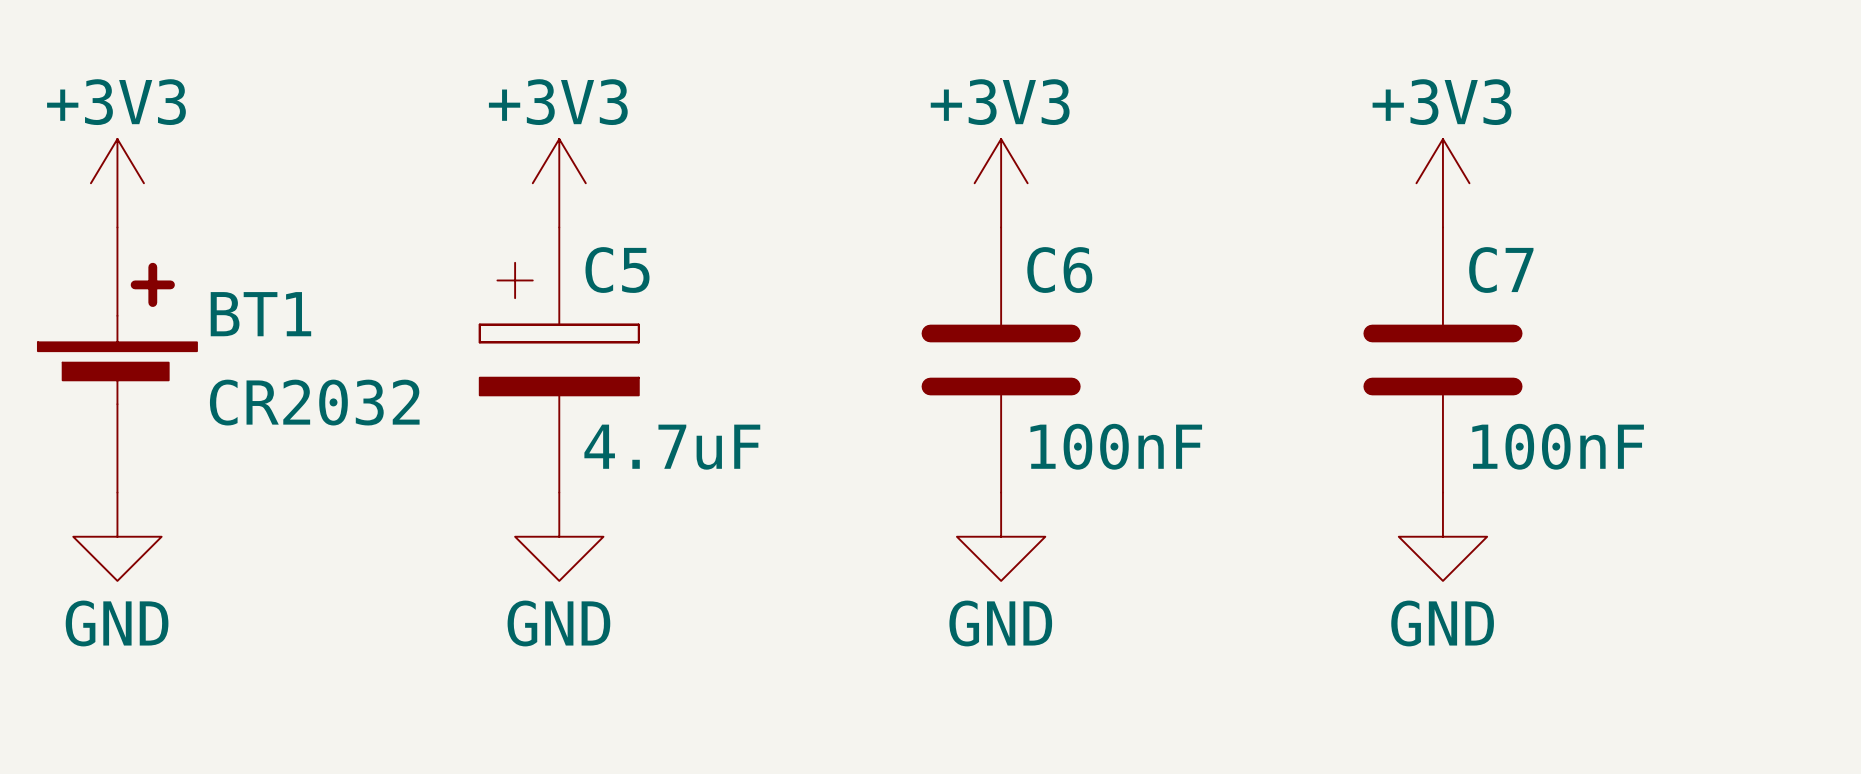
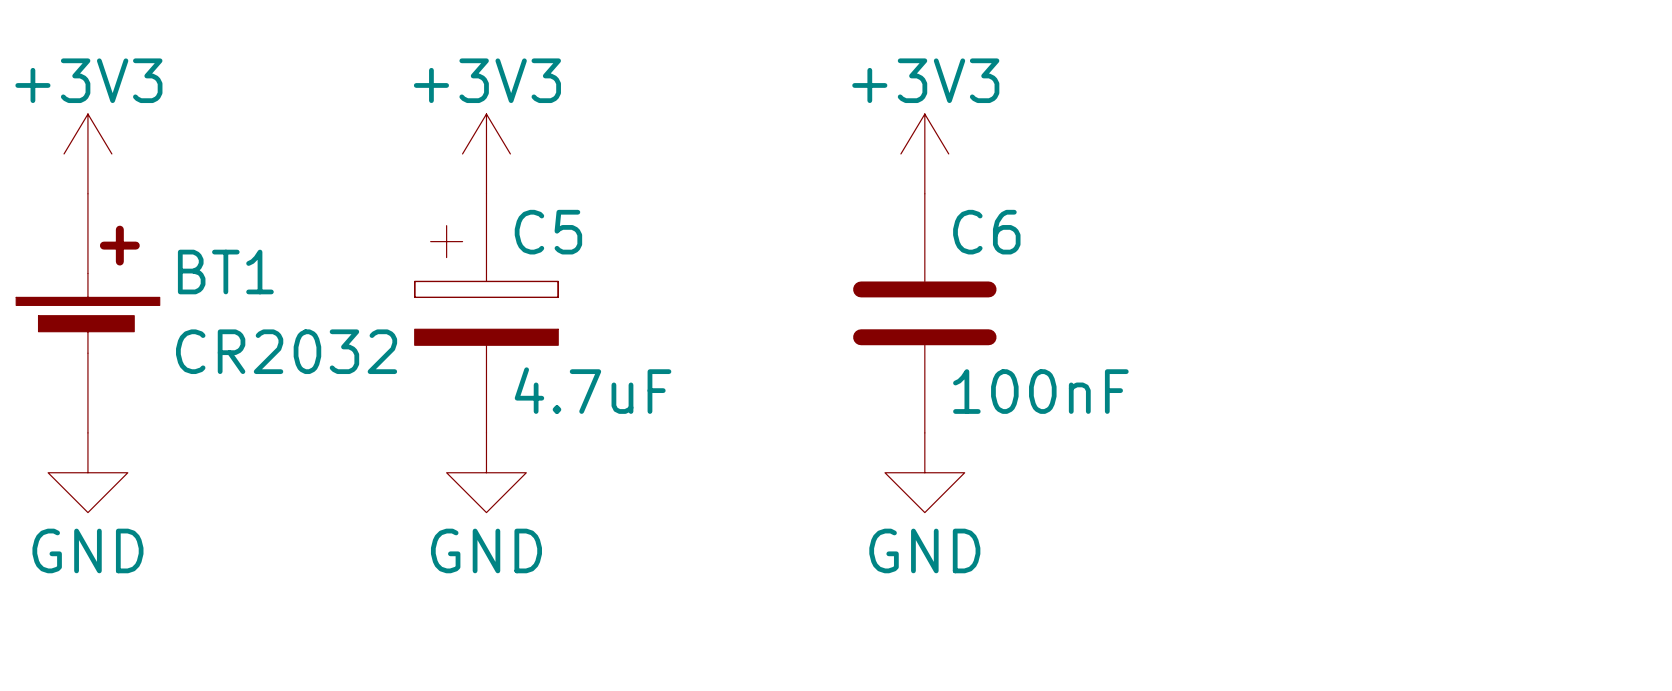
power symbol position: +3V3 (1001, 183) -> +3V3 (924, 153)
power symbol: +3V3 (1442, 183) -> none
C6 position: (1001, 360) -> (924, 313)
C7: 100nF (1442, 360) -> none
power symbol position: GND (1001, 536) -> GND (924, 472)
power symbol: GND (1442, 536) -> none

